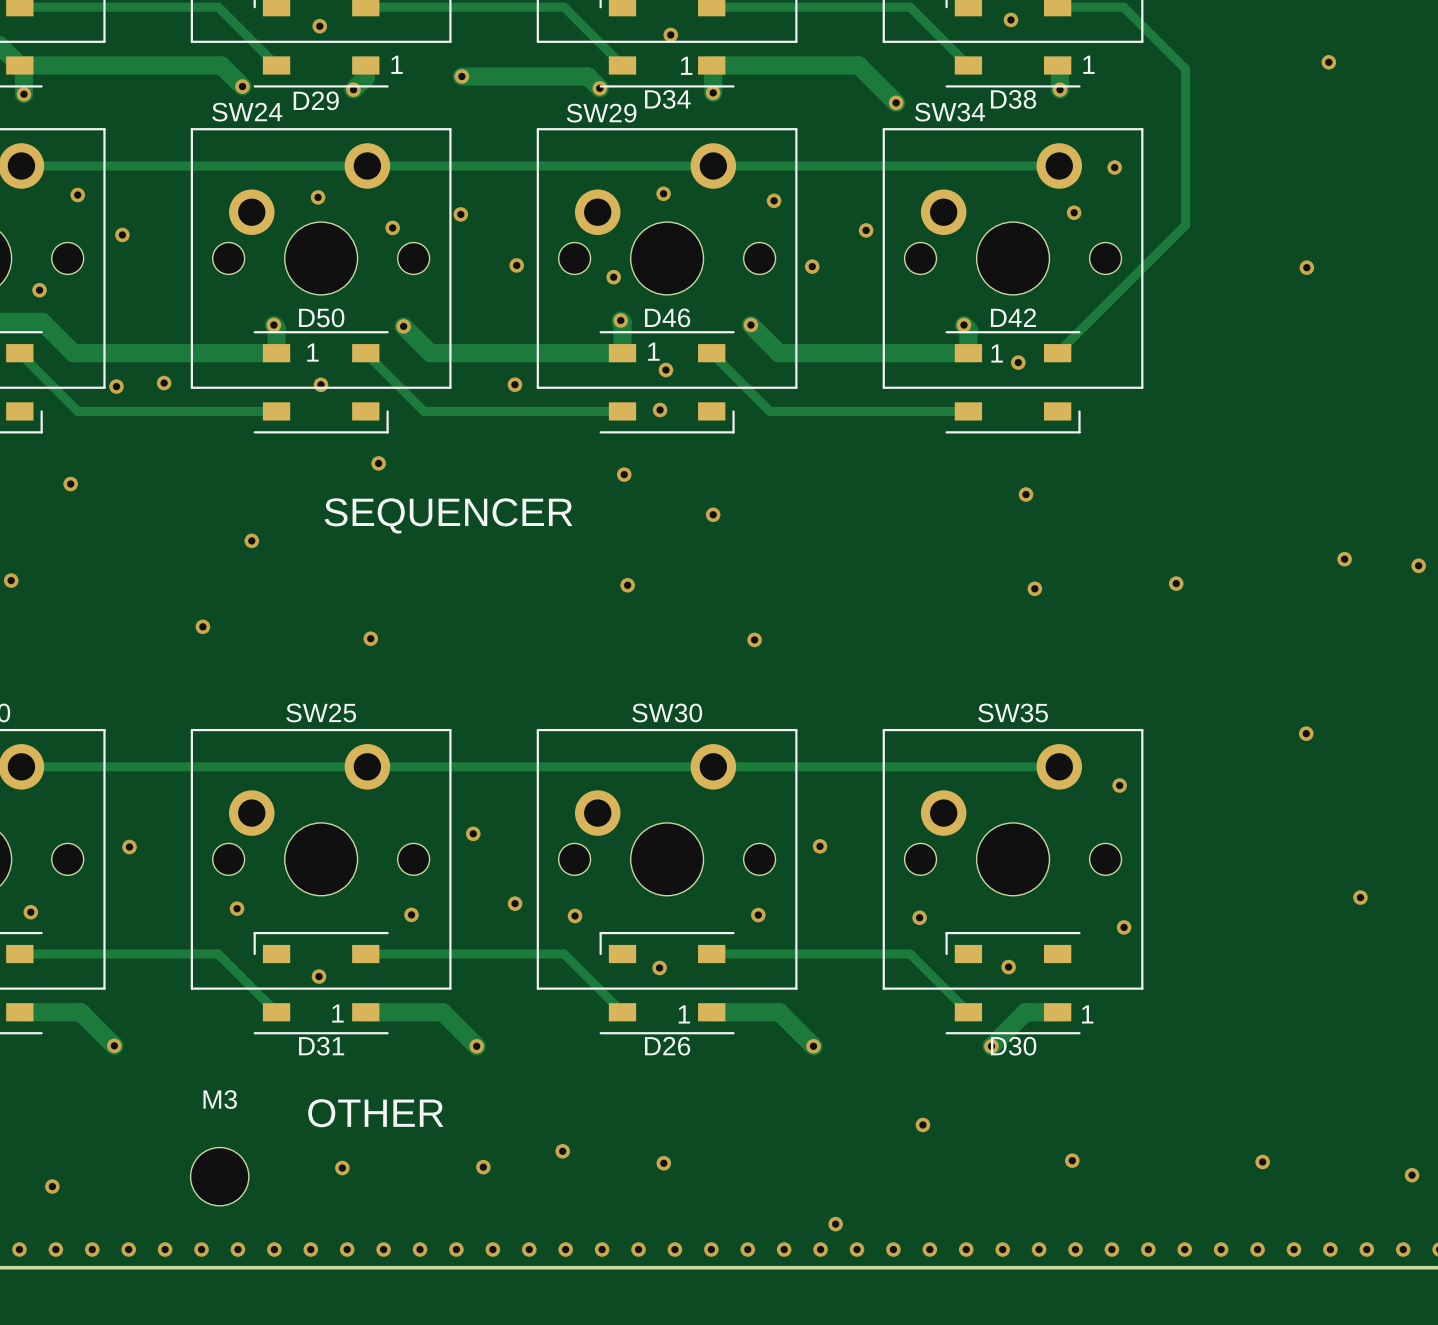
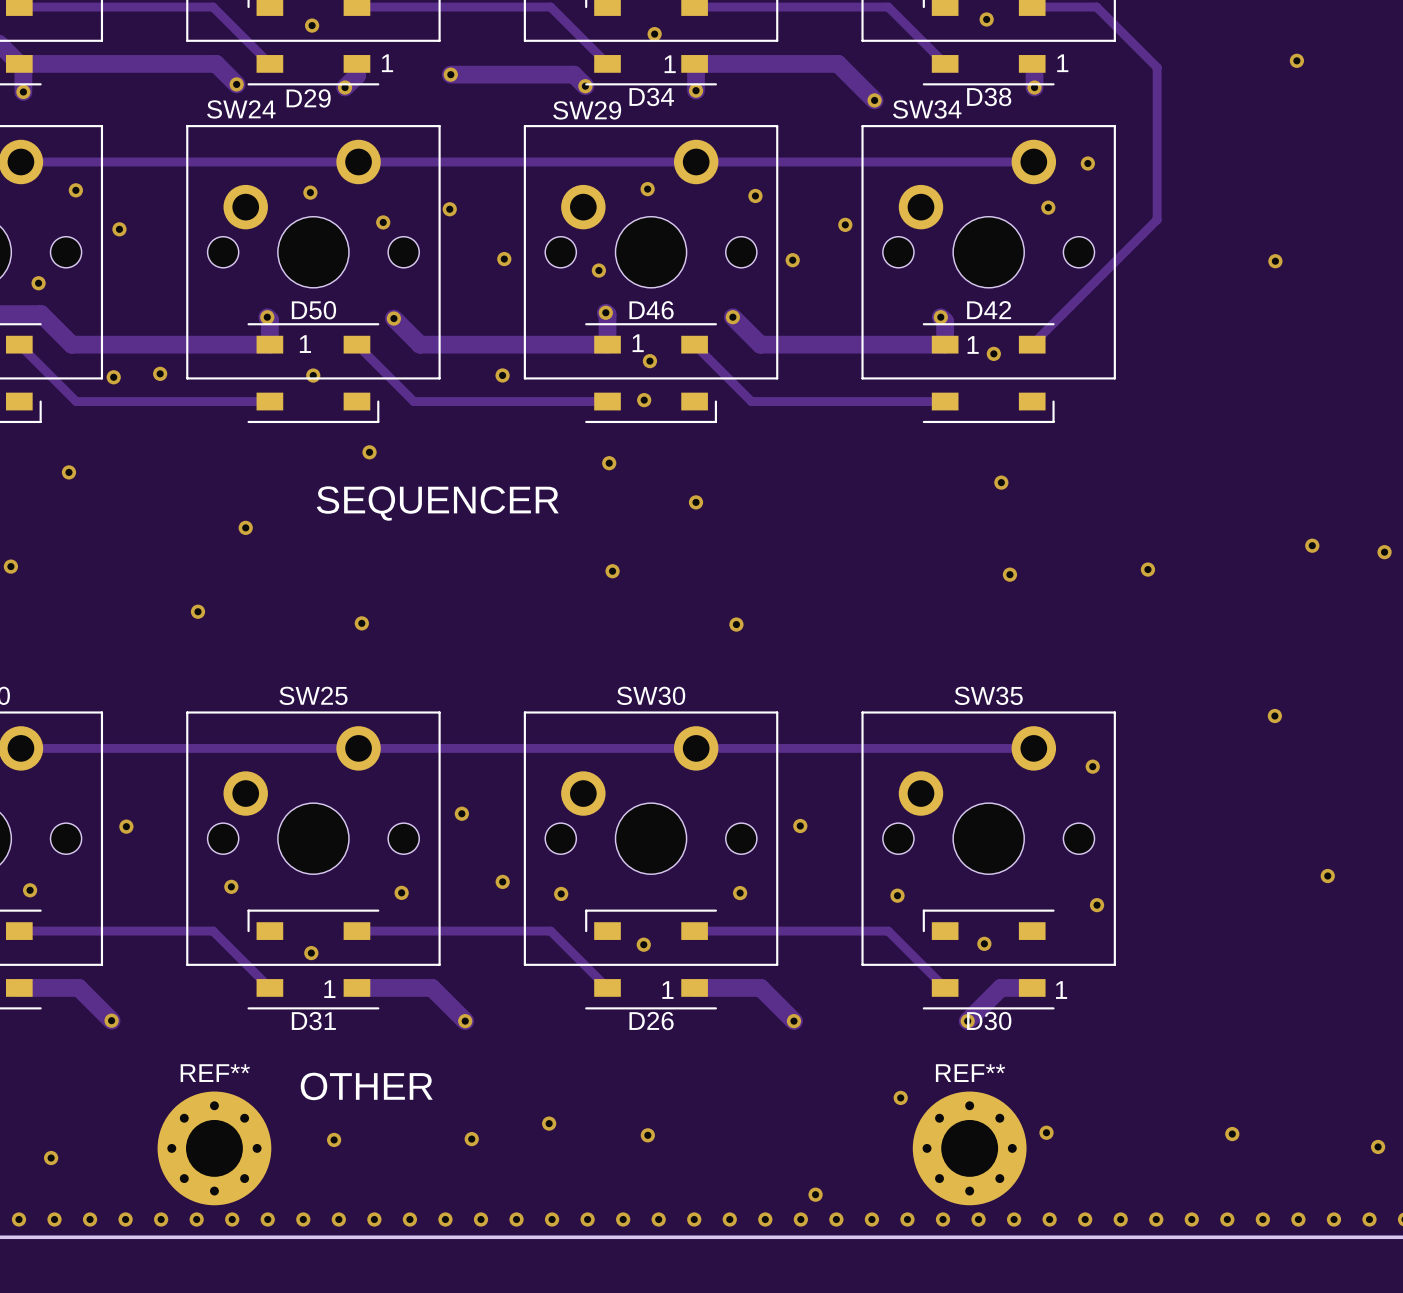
M3: (219, 1176) -> none
REF**: none -> (214, 1148)
REF**: none -> (969, 1148)

